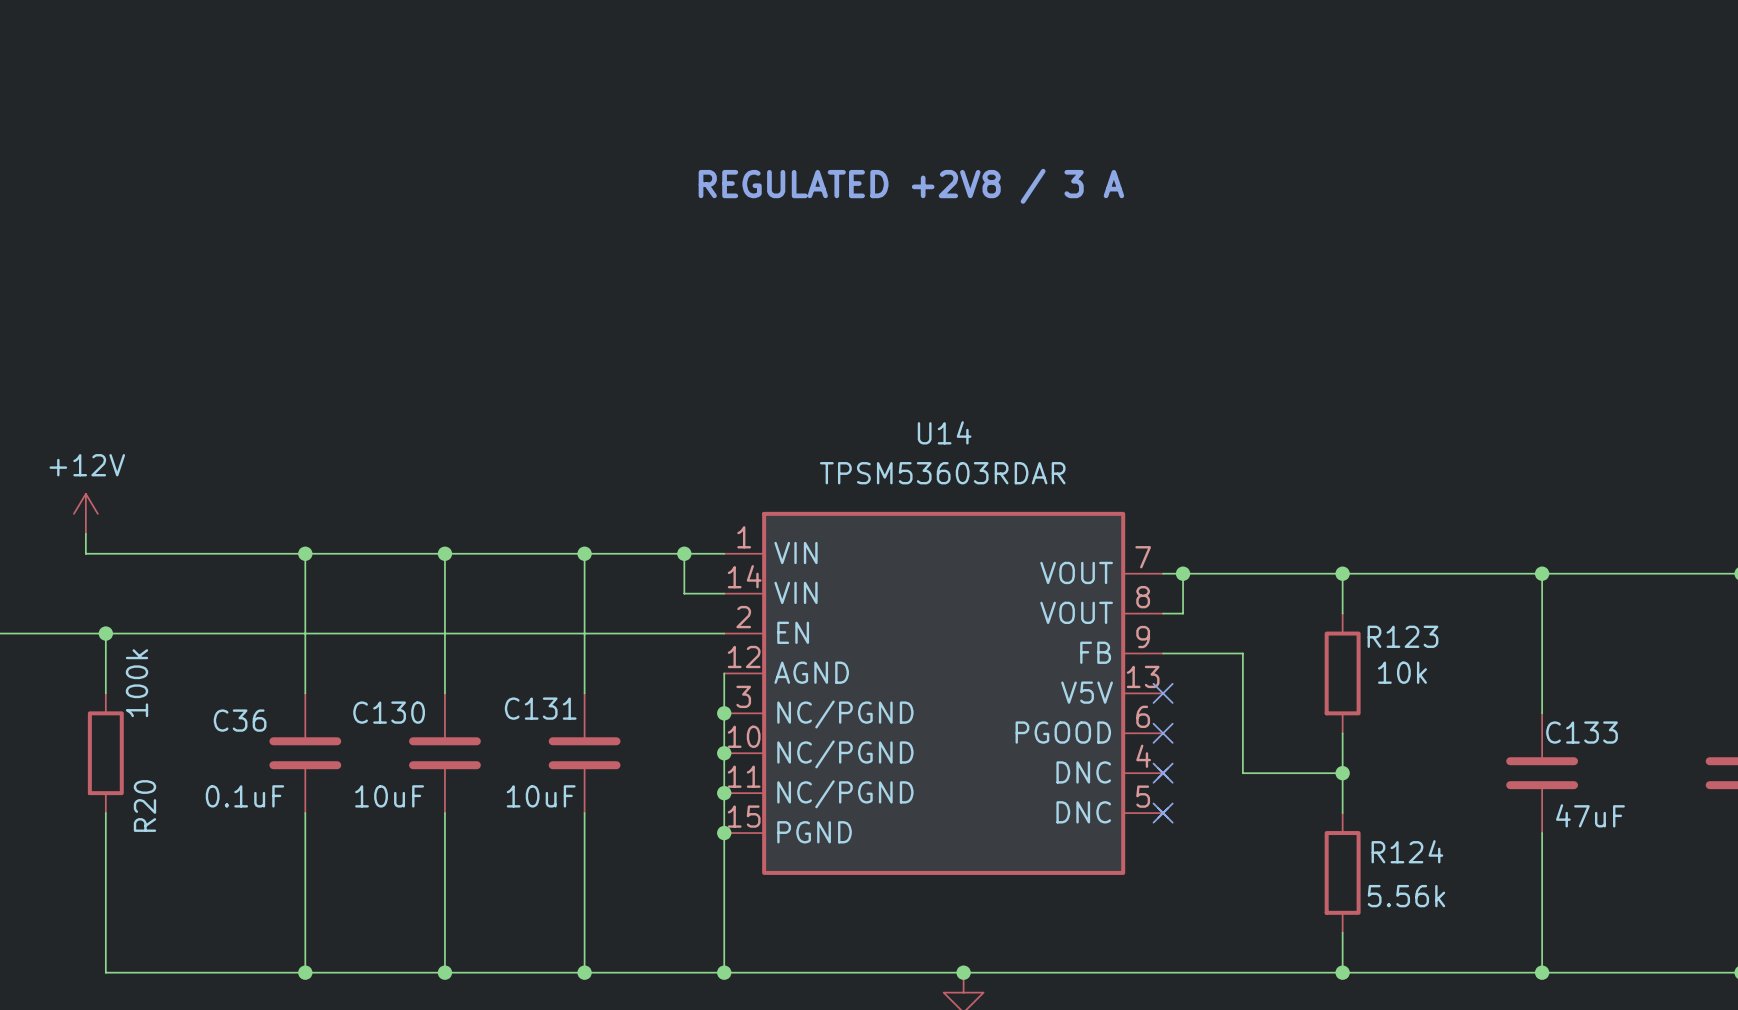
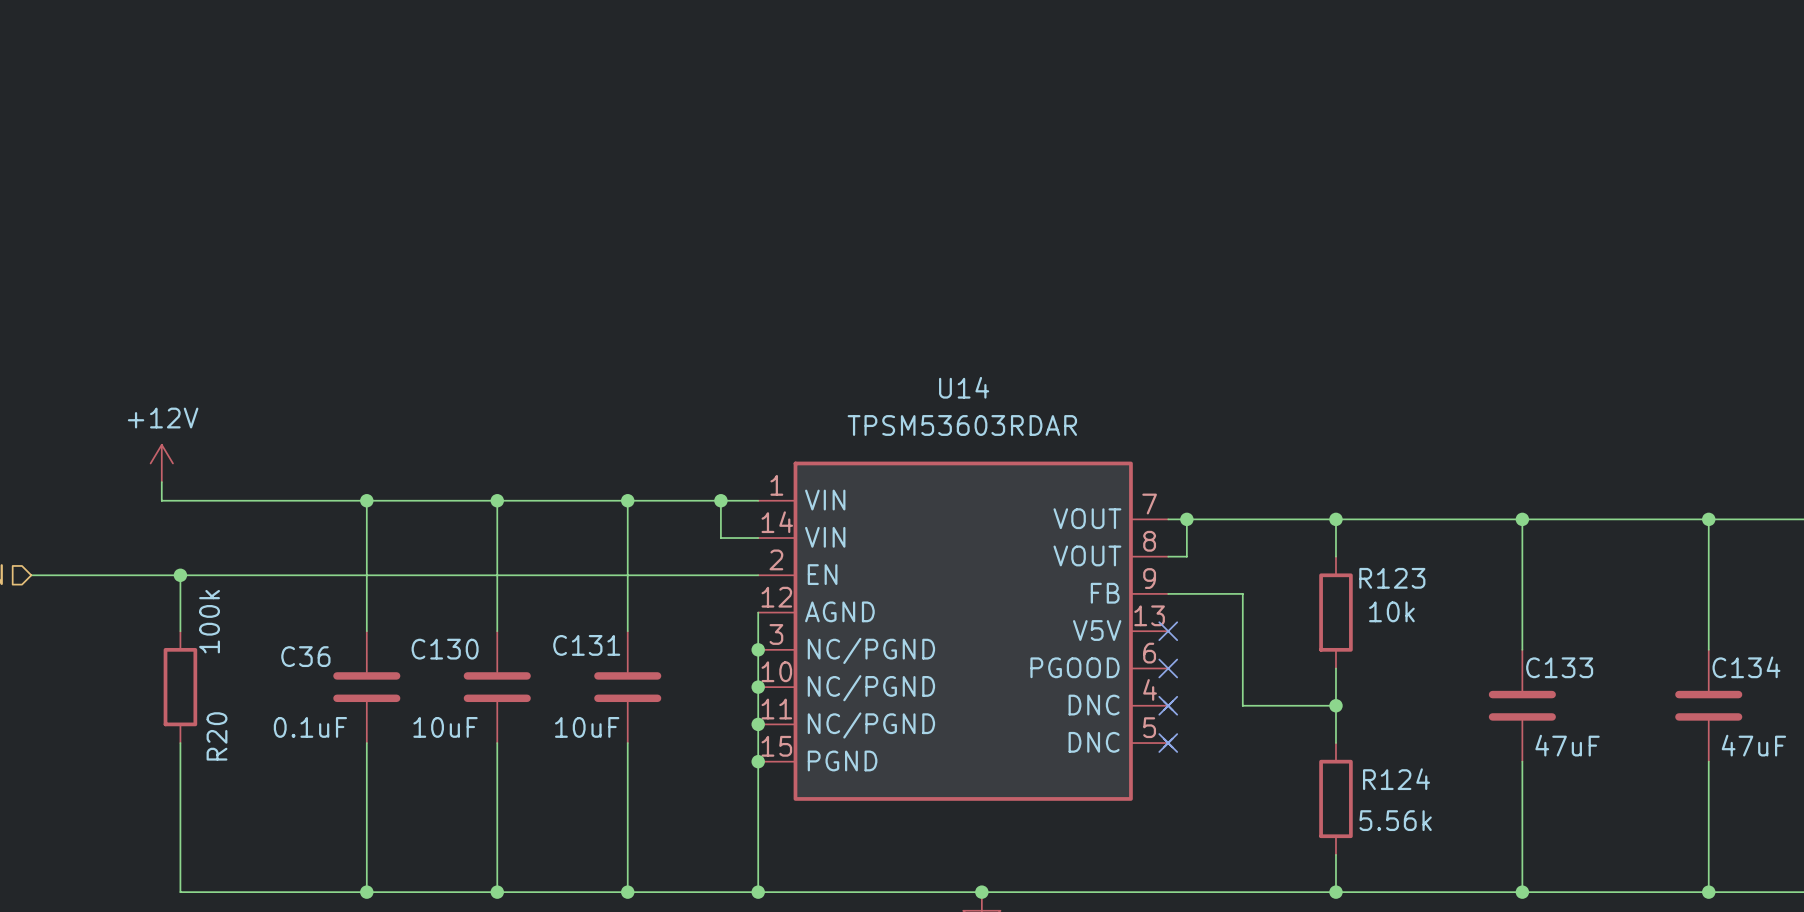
text: REGULATED +2V8 / 3 A (911, 186) -> none

